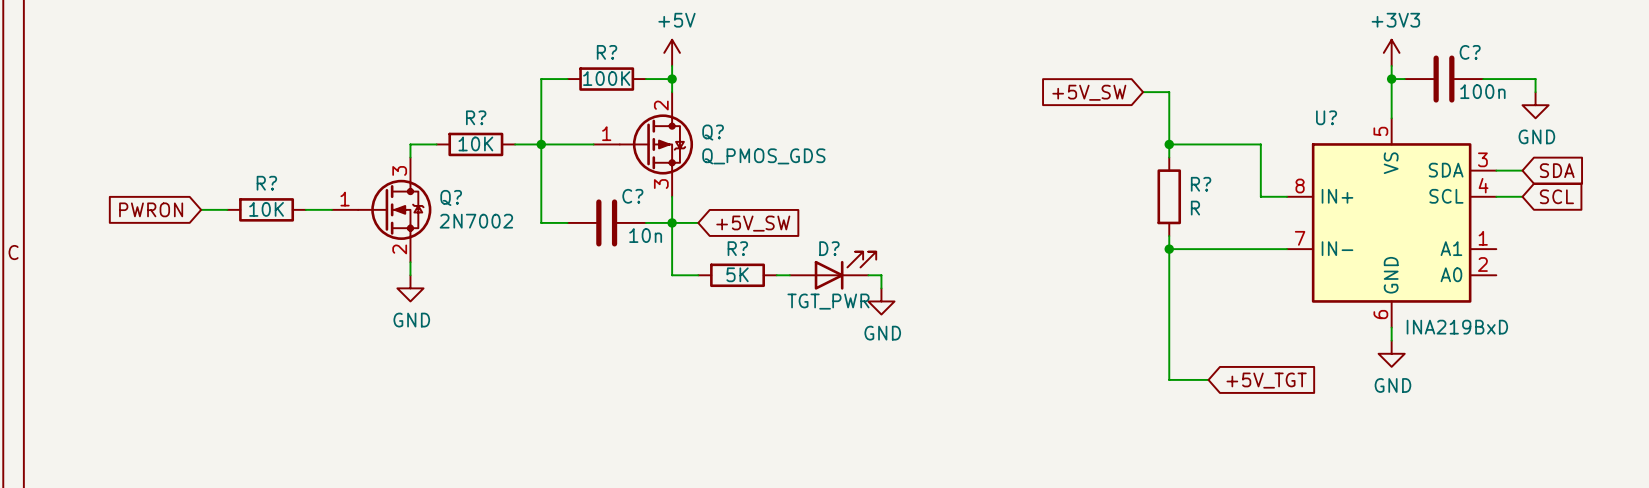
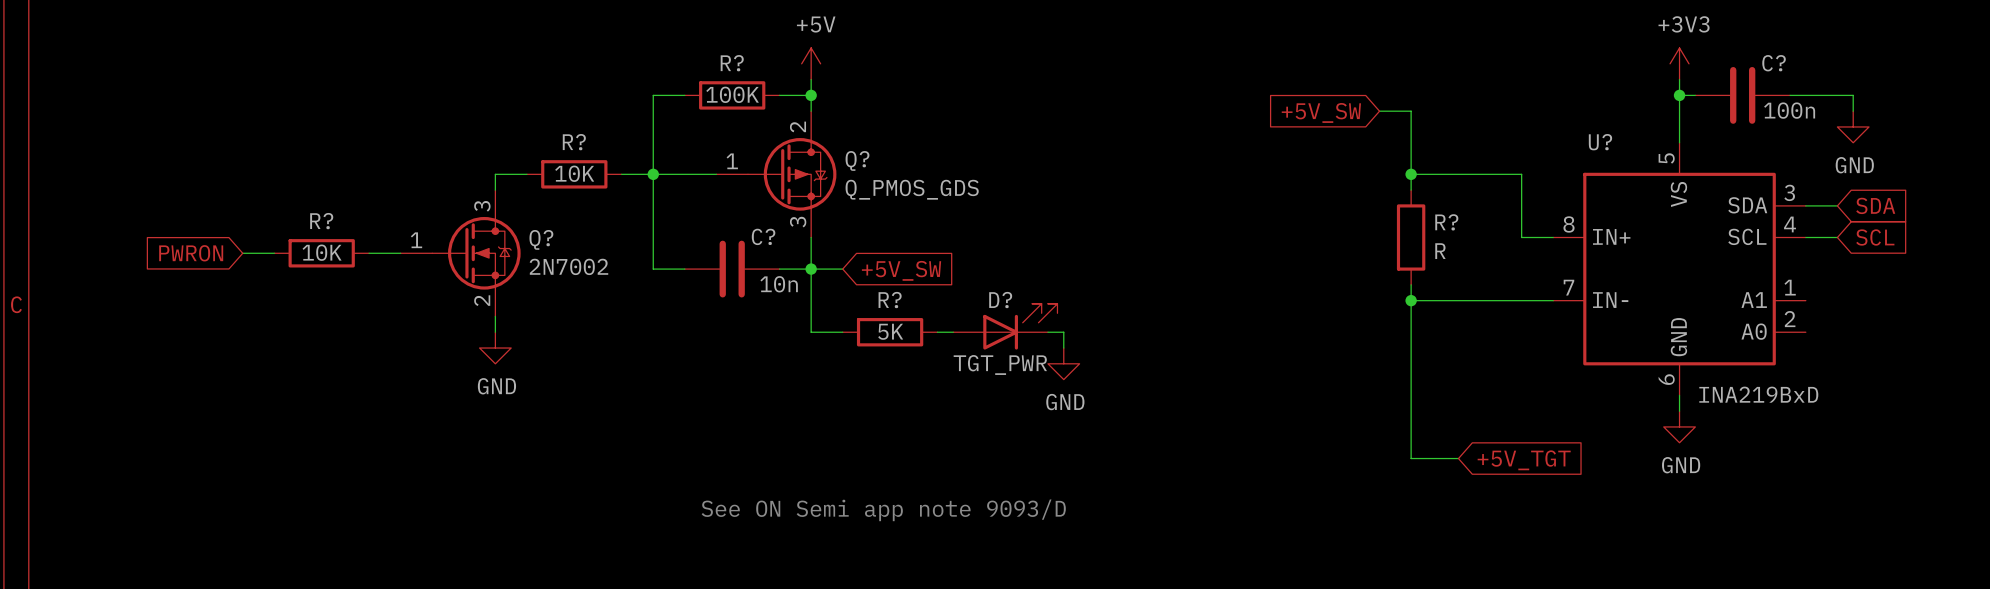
text: none -> See ON Semi app note 9093/D (883, 510)

